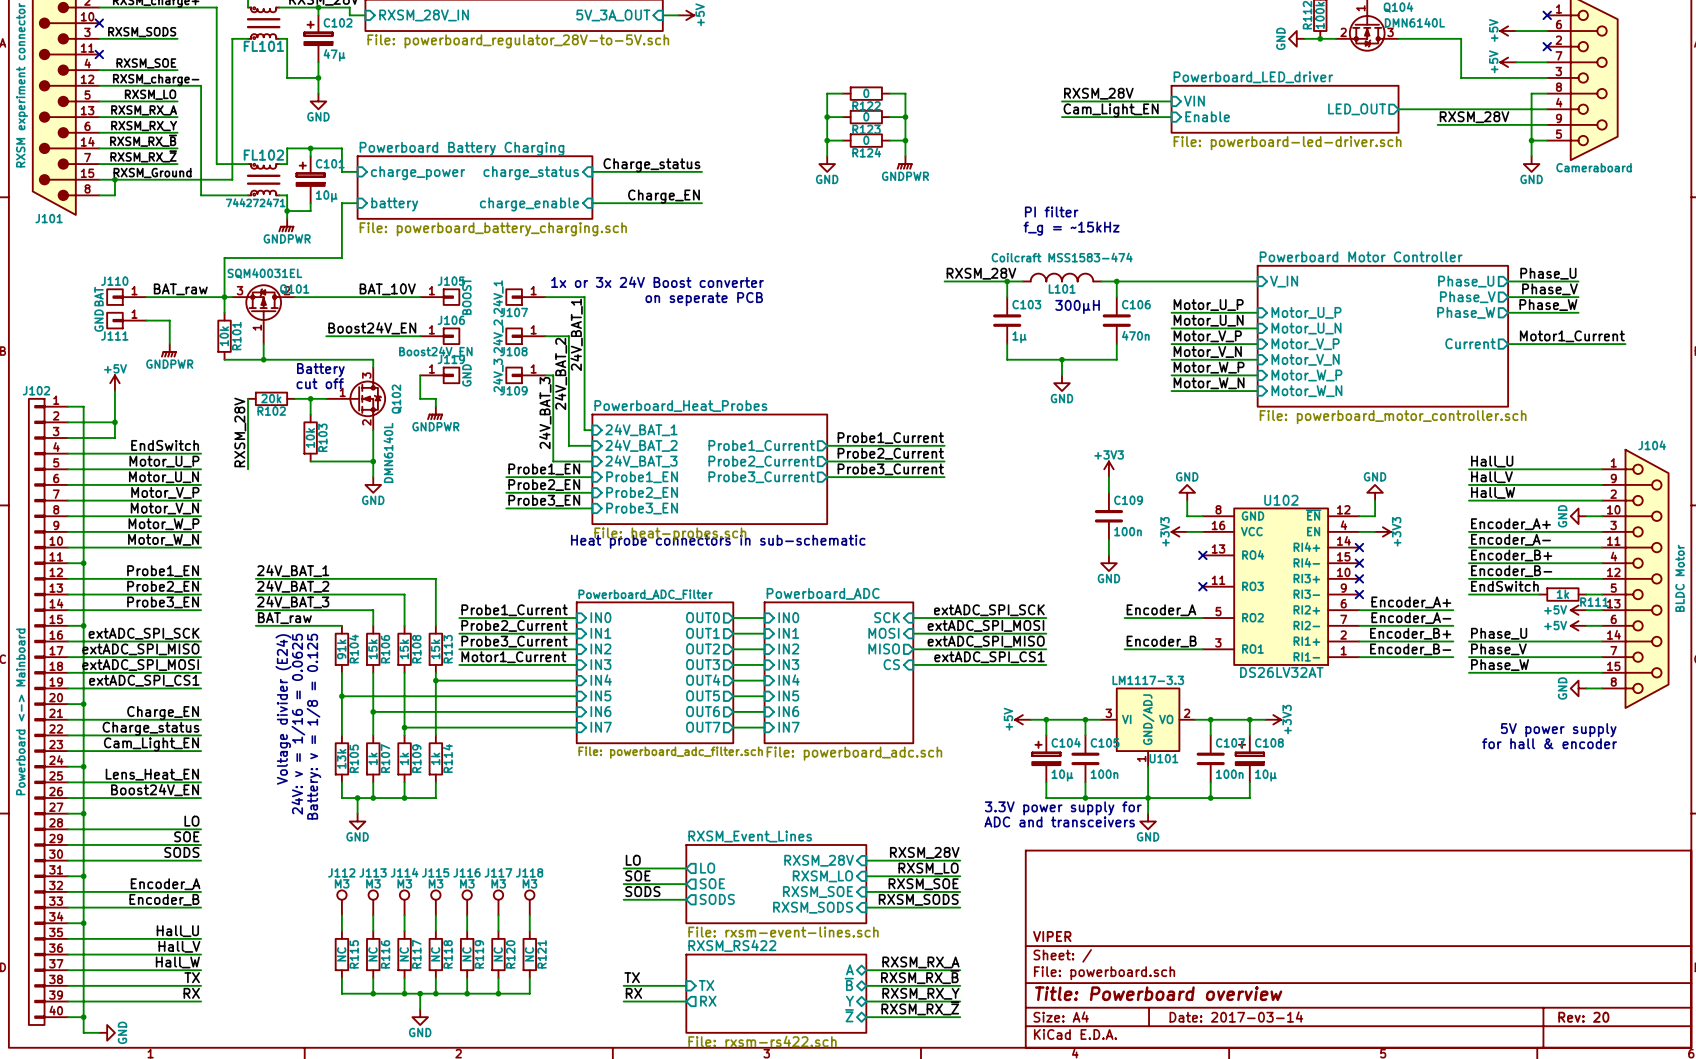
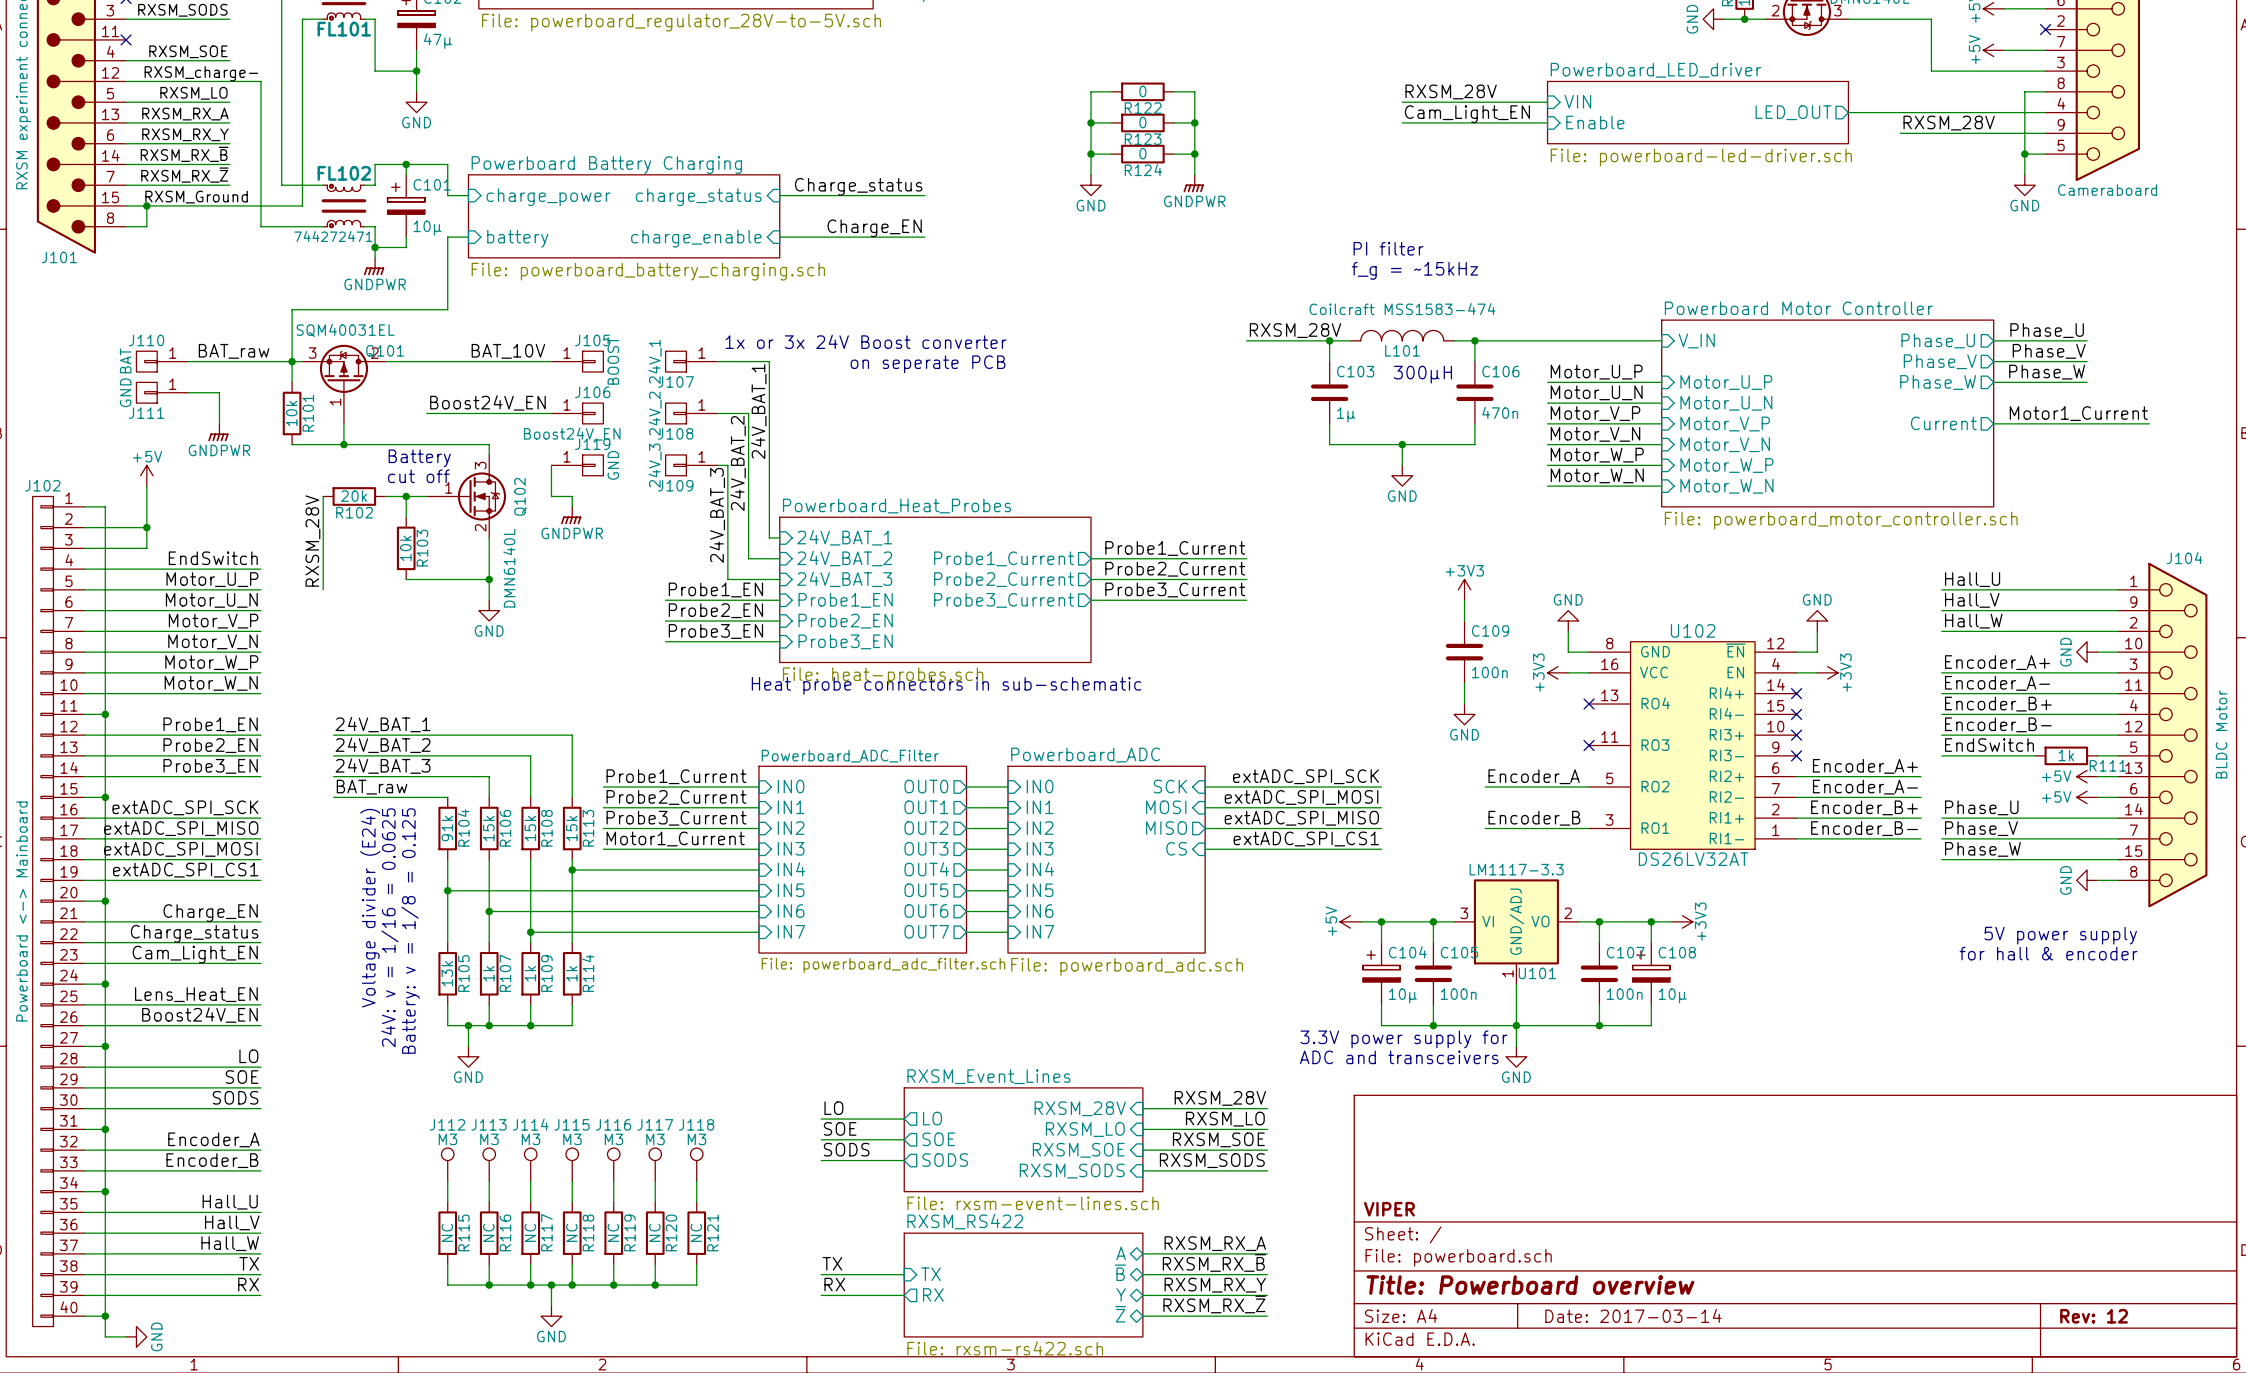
title block: Rev: 20 (1583, 1017) -> Rev: 12 (2094, 1316)

